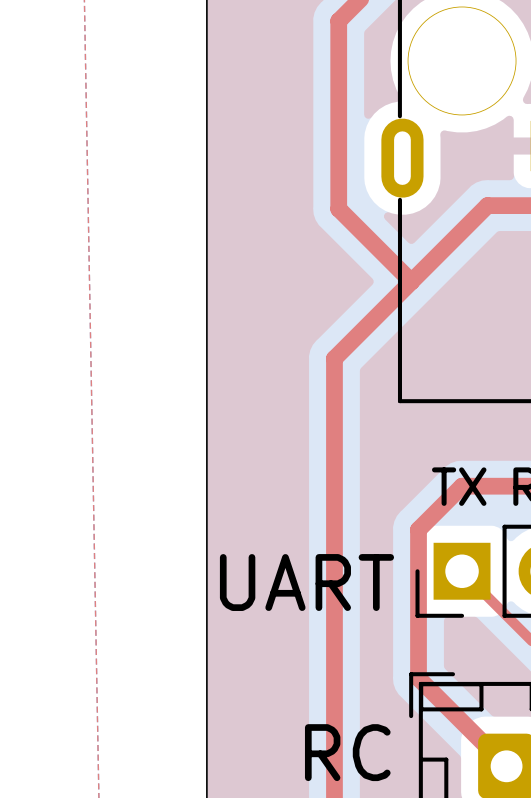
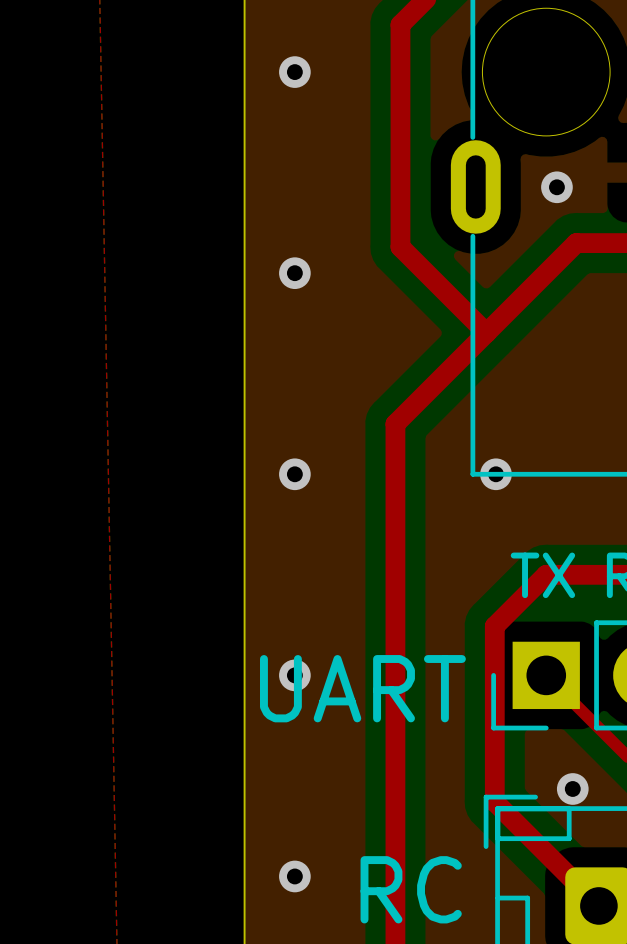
via: none -> (294, 72)
via: none -> (556, 187)
via: none -> (294, 273)
via: none -> (294, 474)
via: none -> (495, 474)
via: none -> (294, 675)
via: none -> (572, 788)
via: none -> (294, 876)

